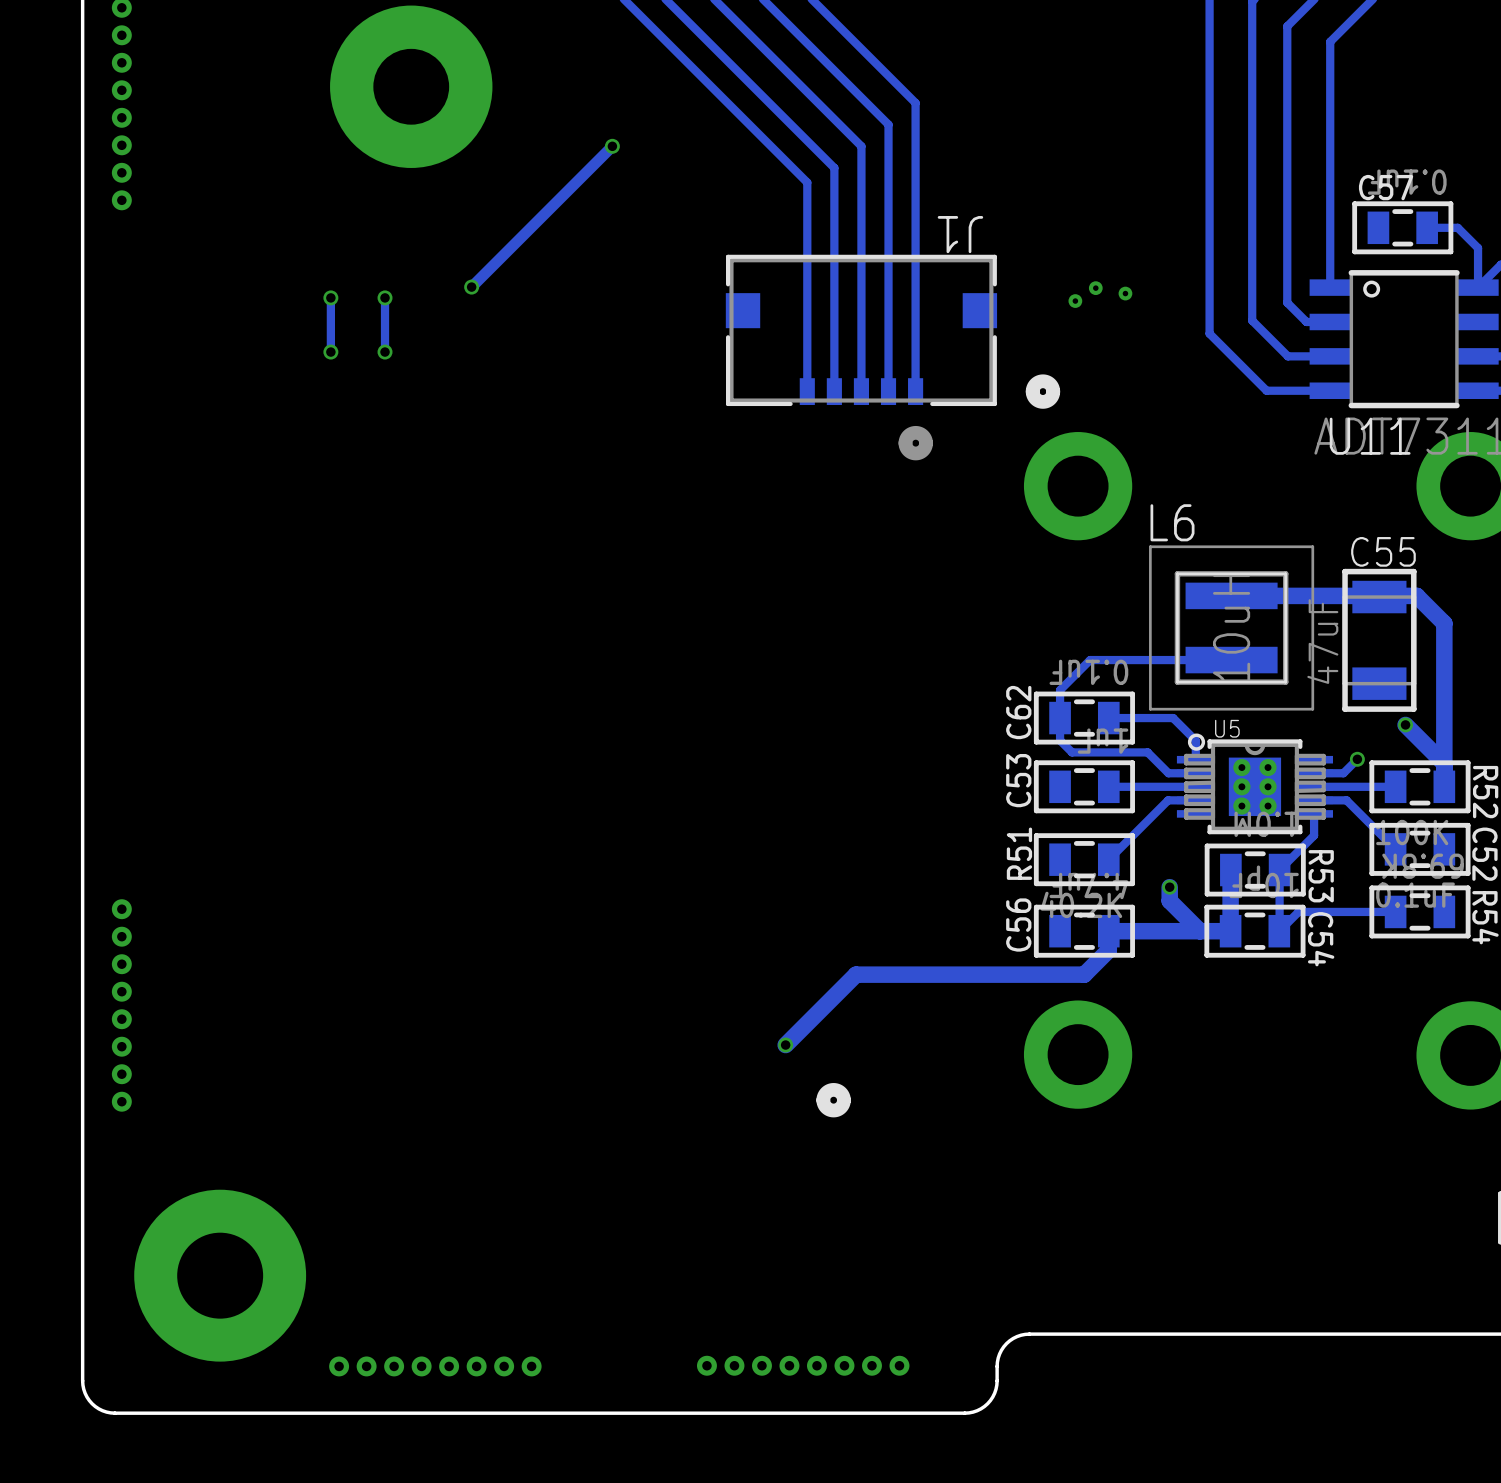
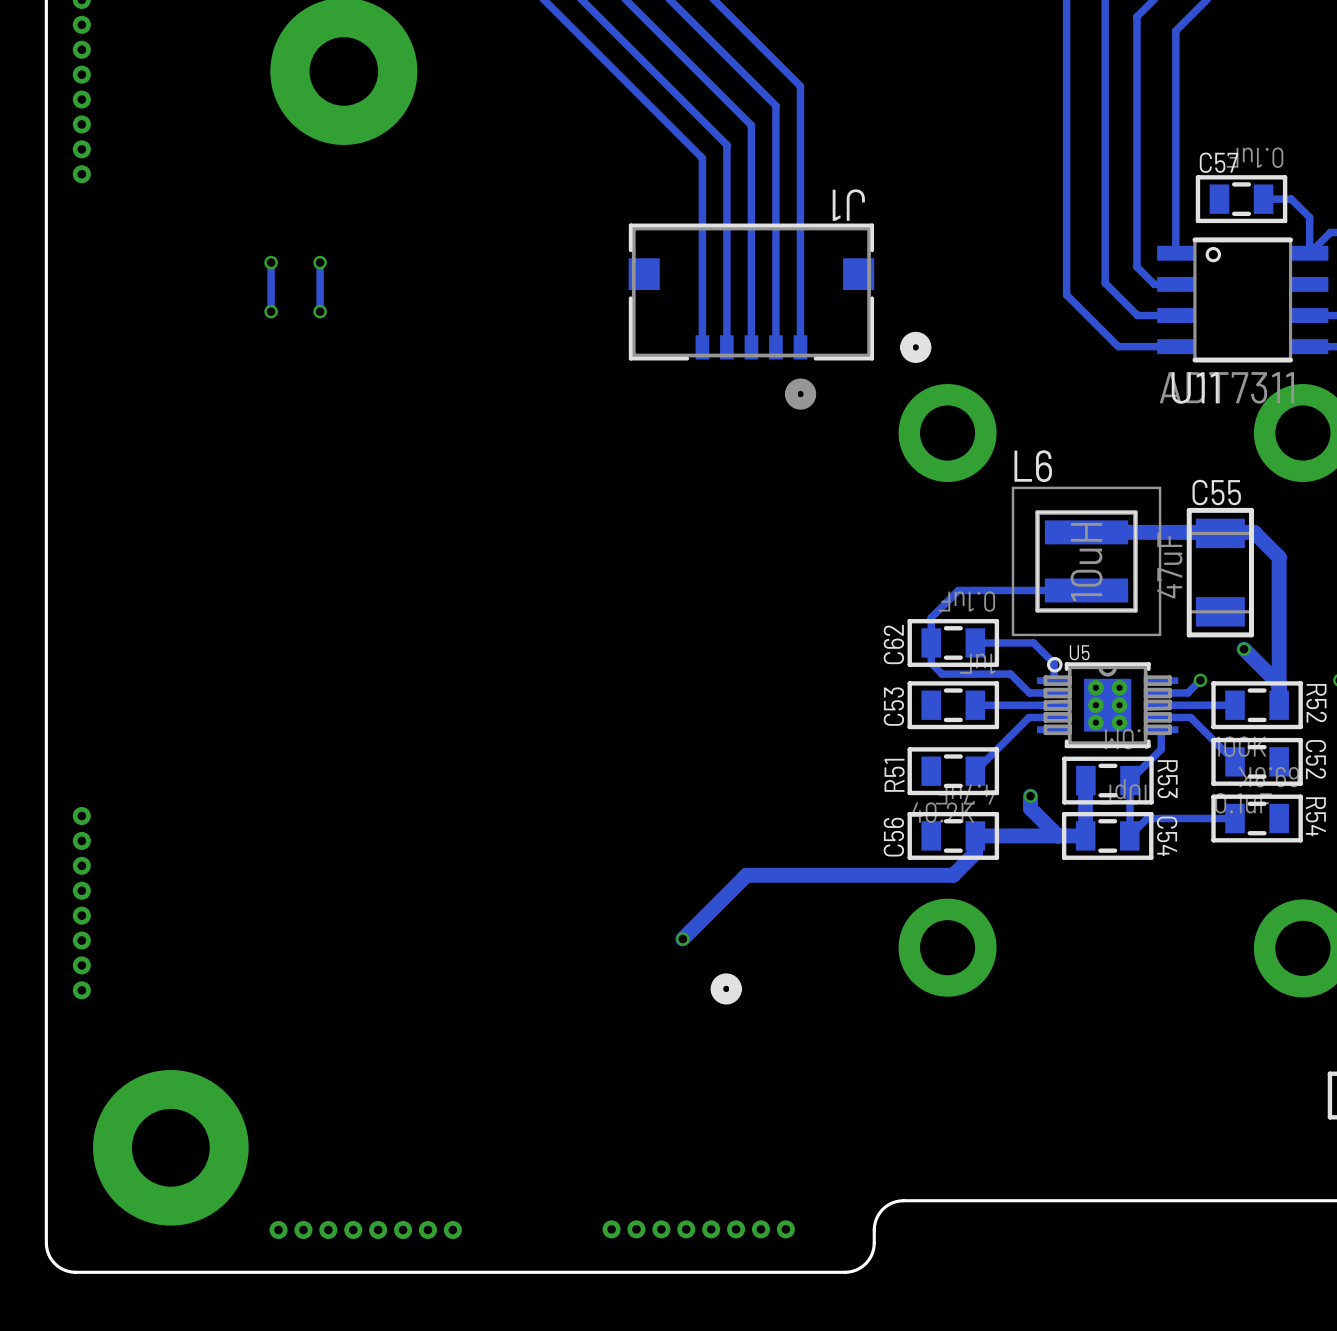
track: (612, 146) (471, 287) -> none
via: (612, 146) -> none
via: (471, 287) -> none
via: (1095, 288) -> none
via: (1125, 293) -> none
via: (1075, 301) -> none

